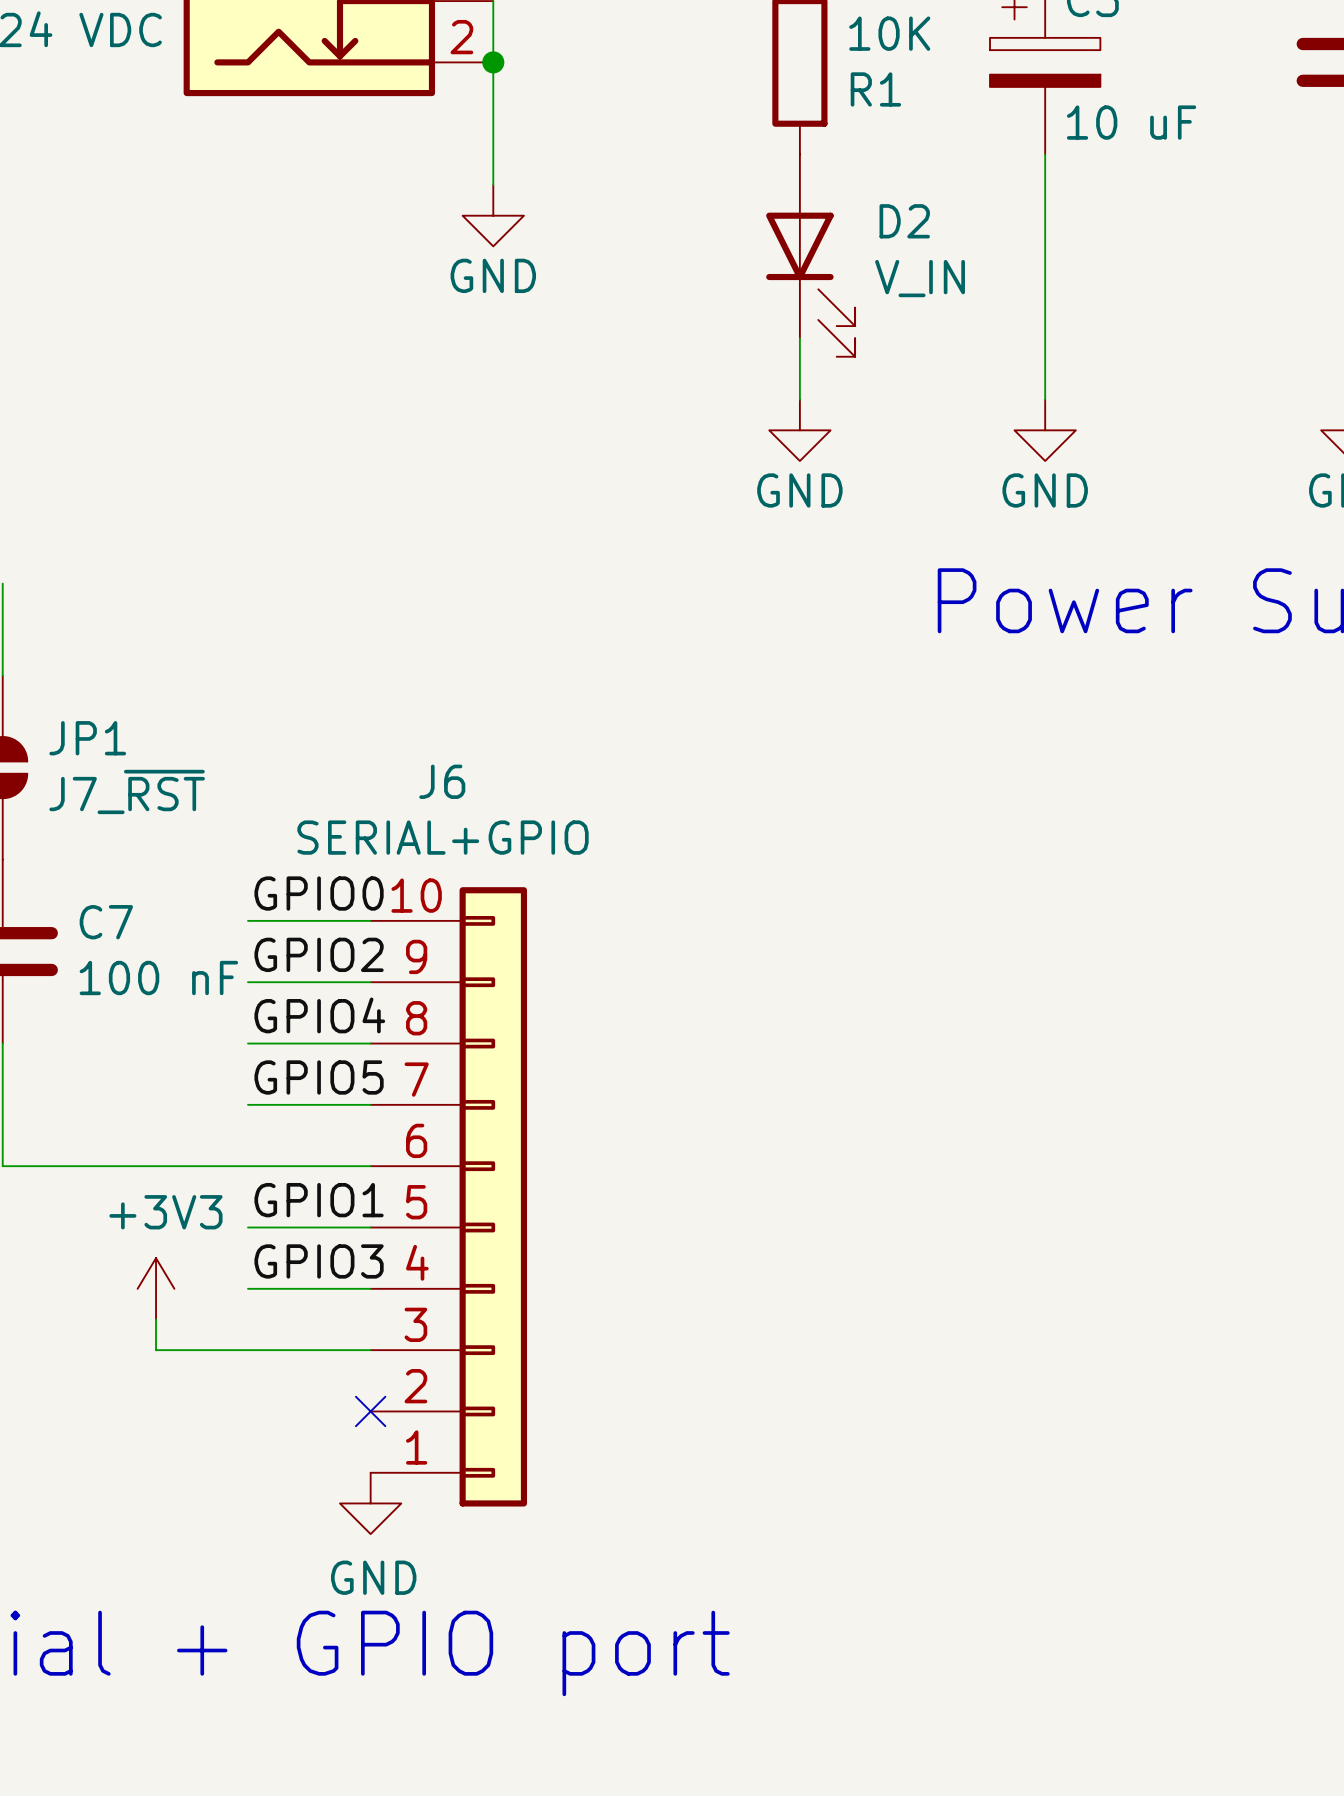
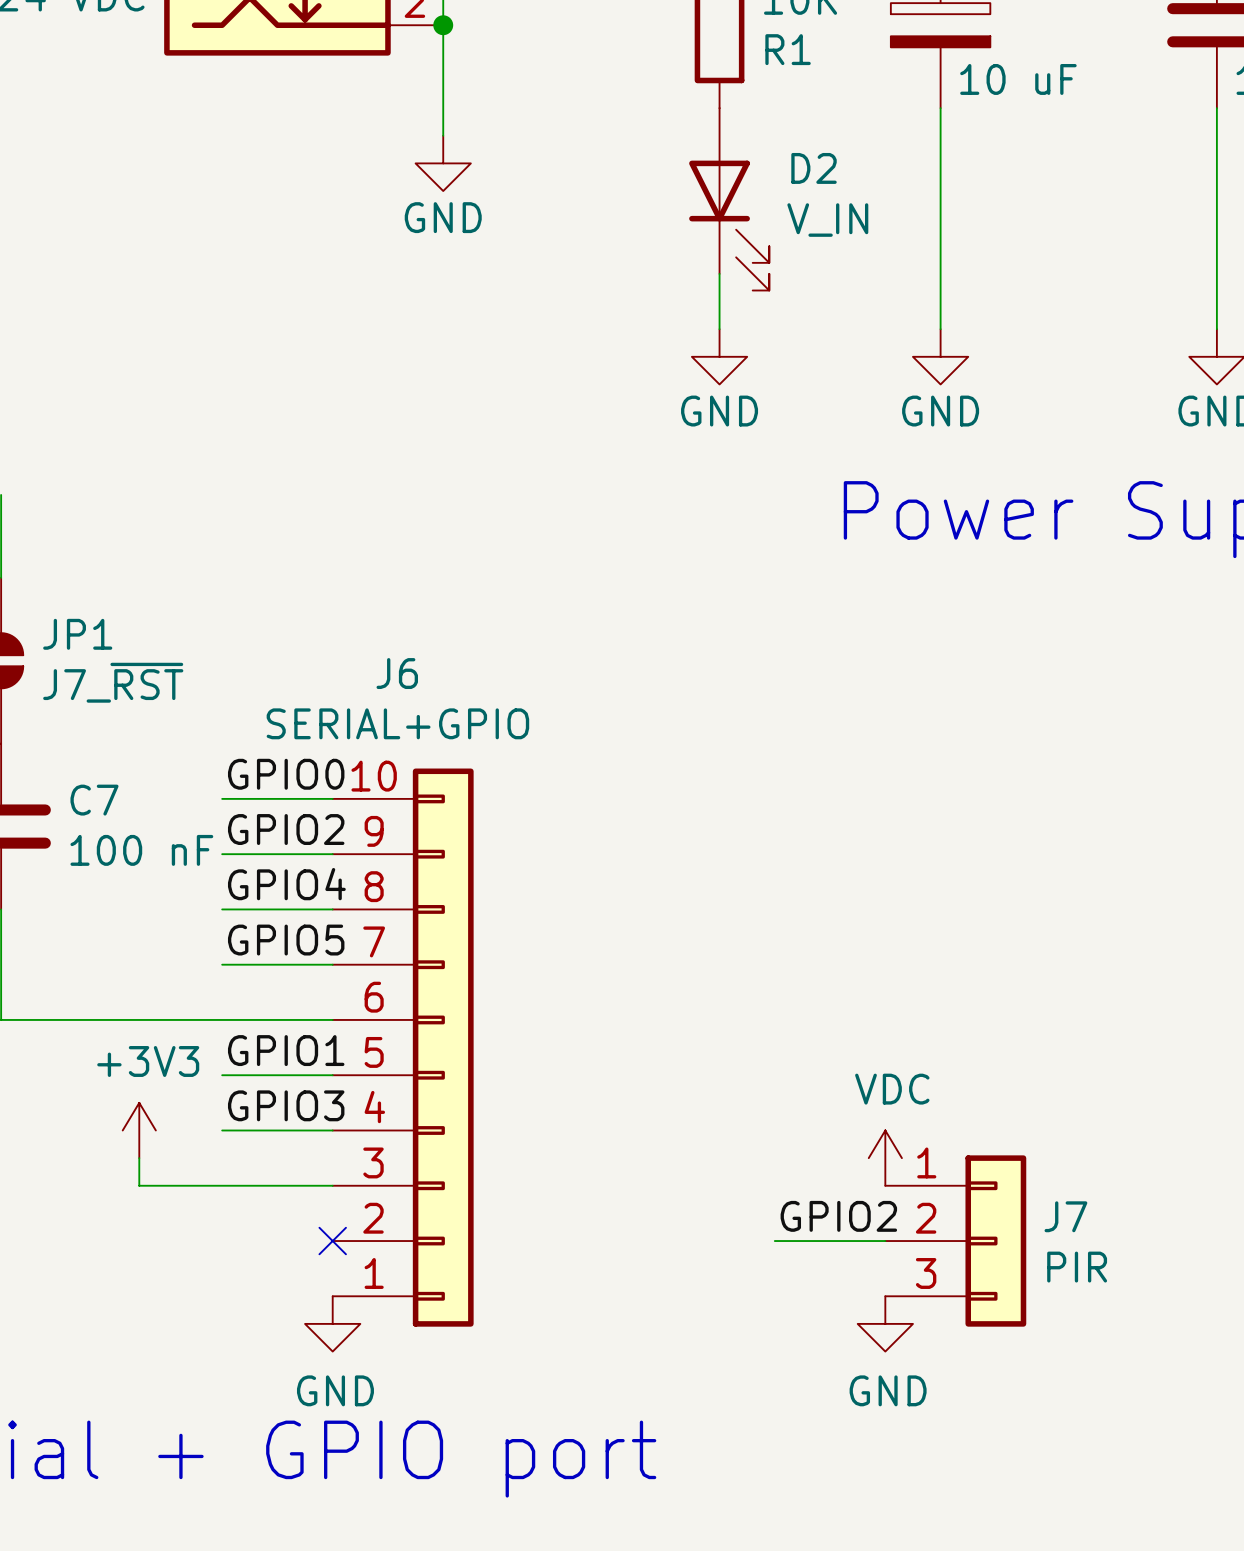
power symbol: none -> VDC (885, 1158)
label: none -> GPIO2 (838, 1216)
wire: none -> (774, 1241) (885, 1241)
J7: none -> PIR (955, 1241)
power symbol: none -> GND (885, 1323)

